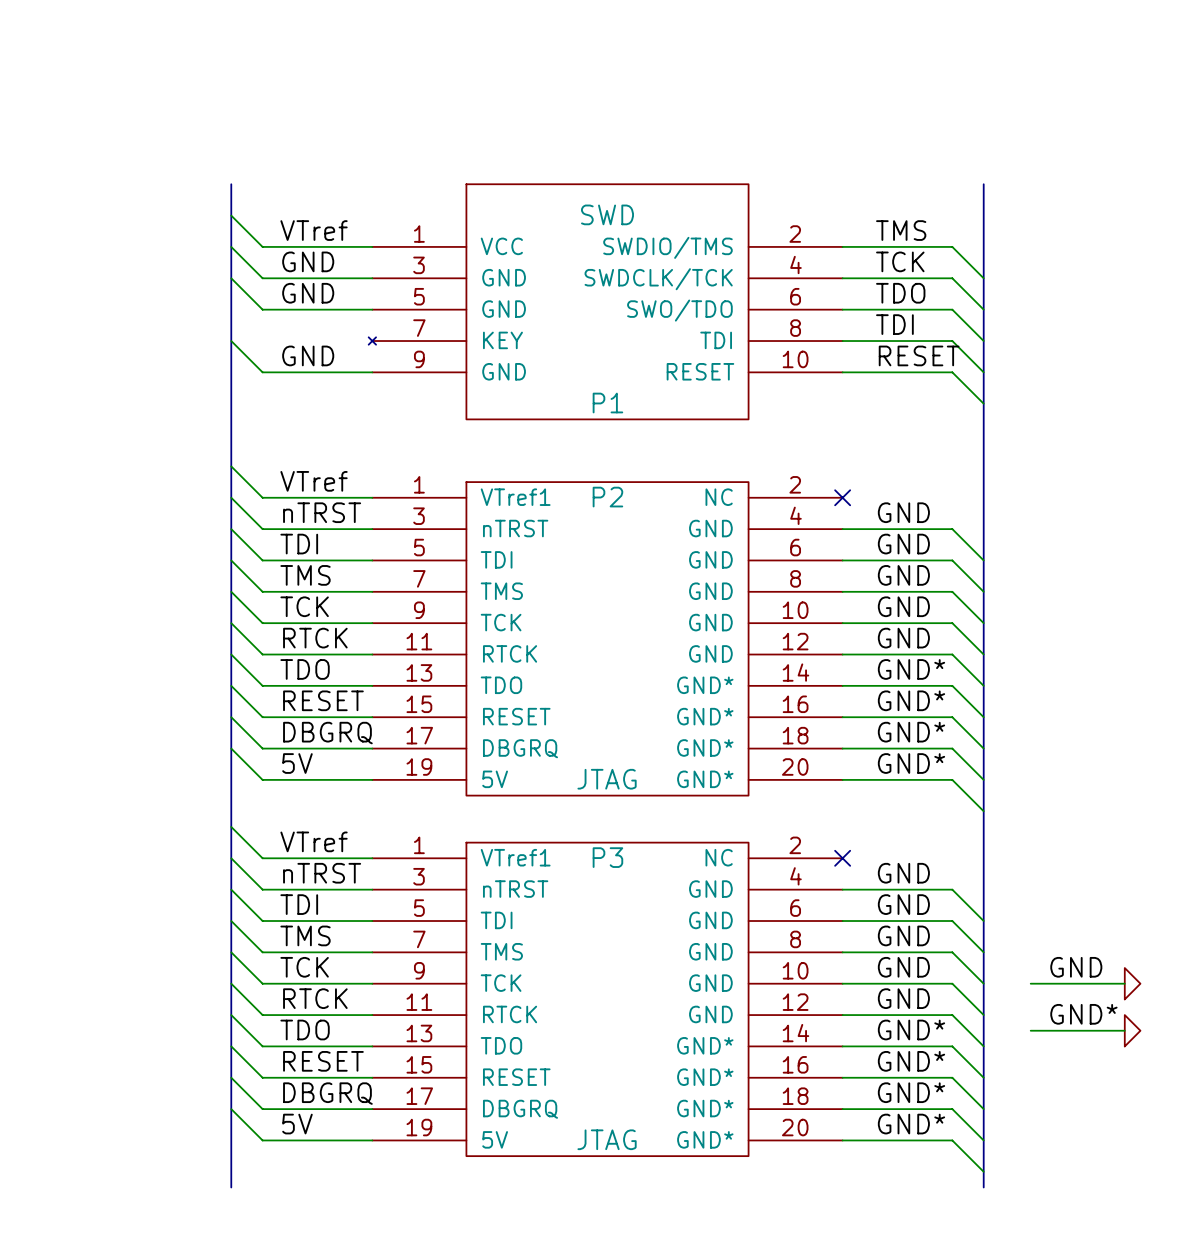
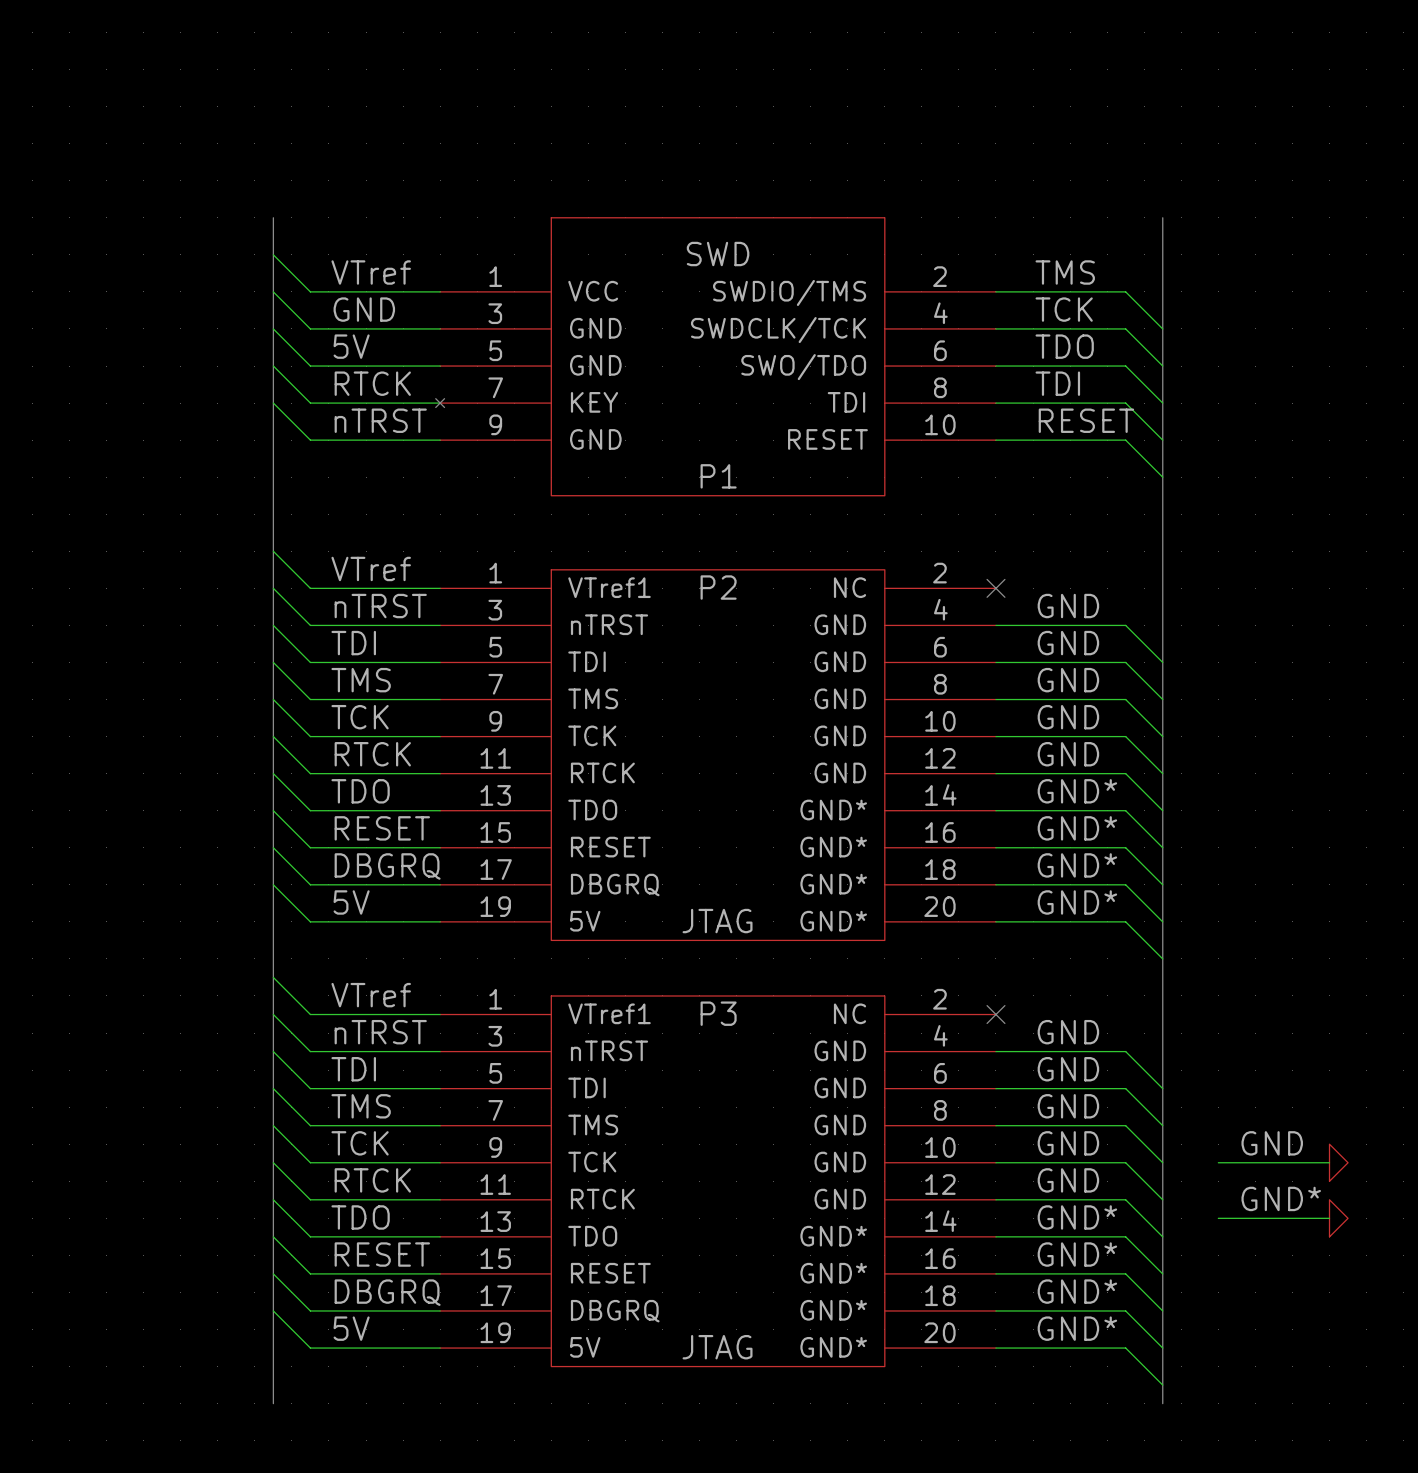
label: GND (308, 293) -> 5V (351, 346)
wire: none -> (273, 366) (310, 403) (440, 403)
label: none -> RTCK (372, 383)
label: GND (308, 355) -> nTRST (380, 420)

